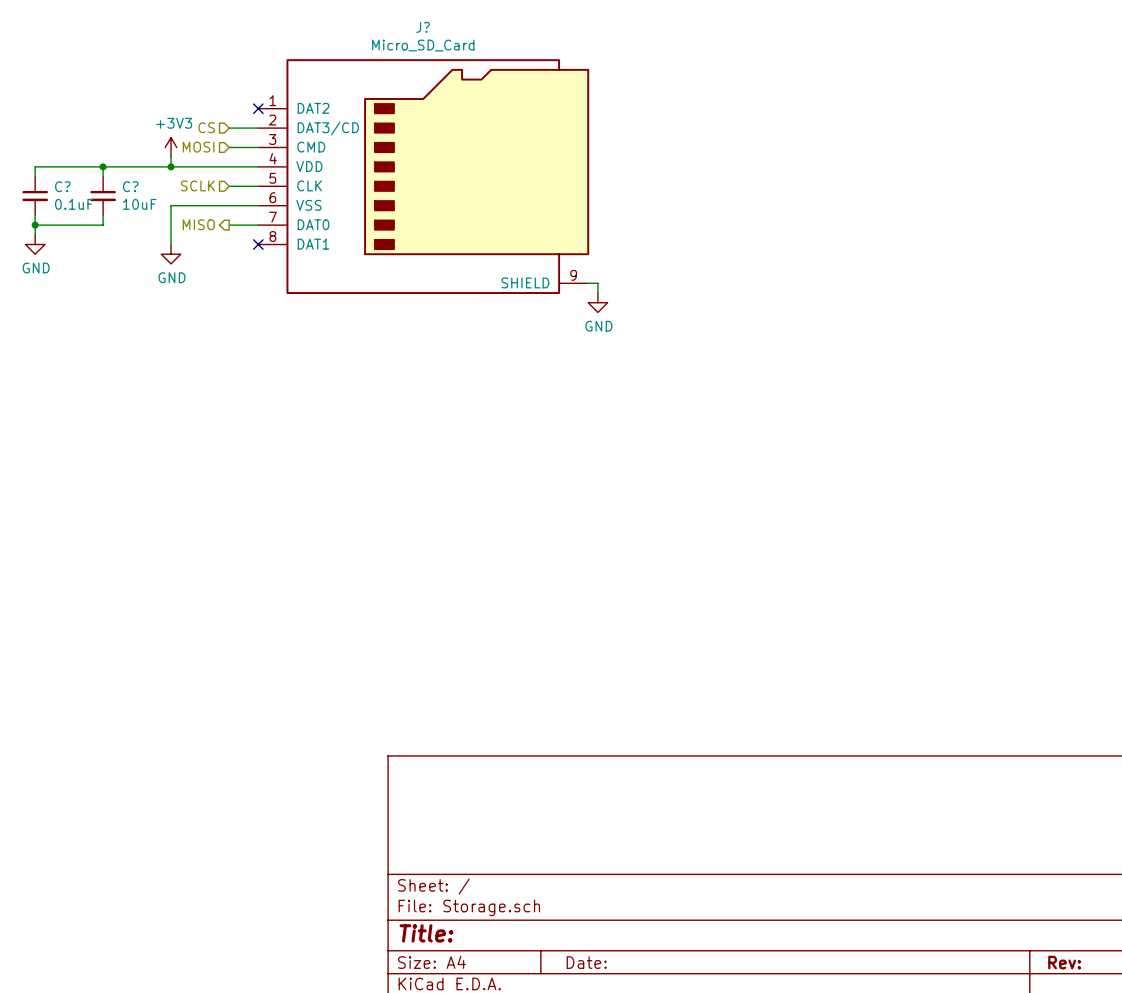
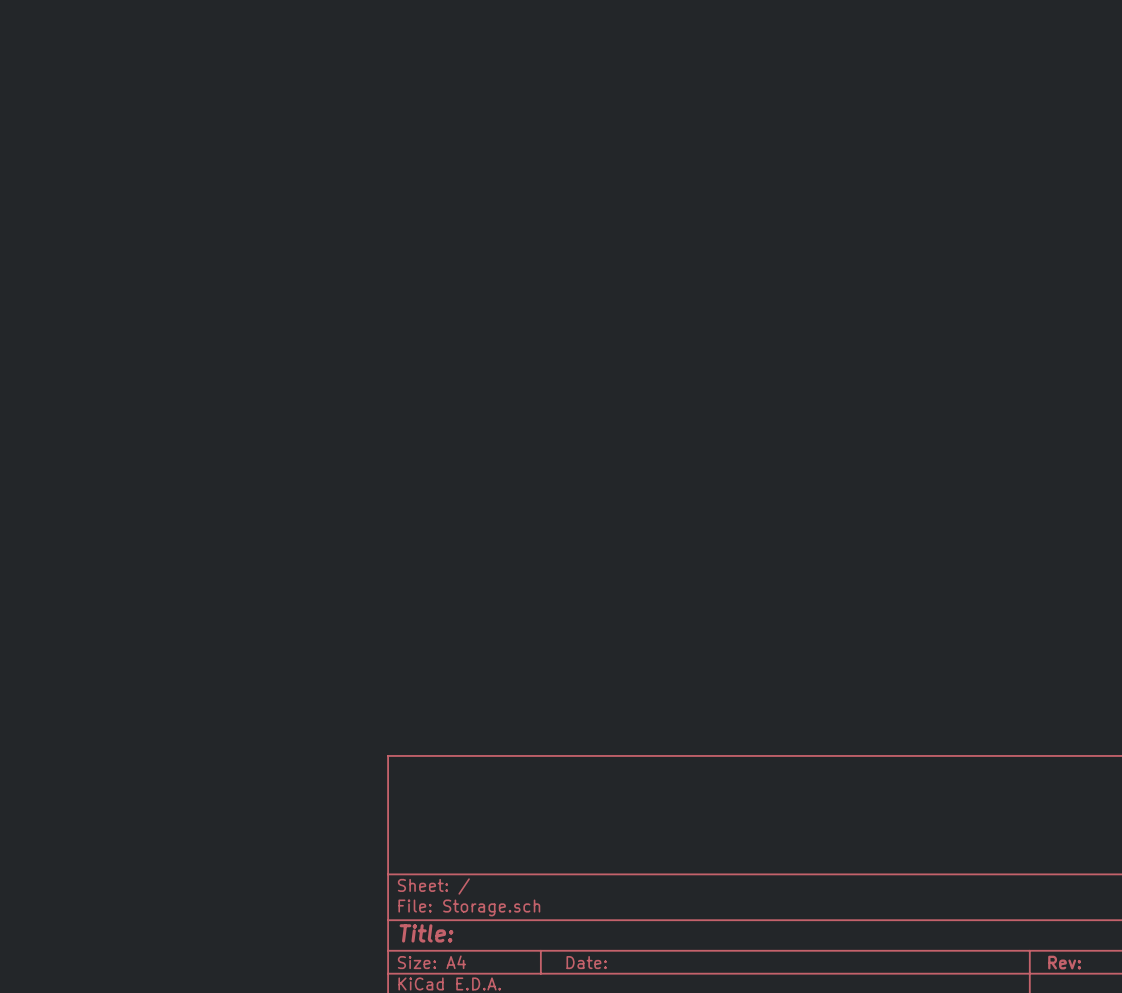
no-connect mark: (258, 108) -> none
hierarchical label: CS (206, 127) -> none
wire: (229, 128) (258, 128) -> none
power symbol: +3V3 (171, 147) -> none
hierarchical label: MOSI (198, 147) -> none
wire: (229, 147) (258, 147) -> none
wire: (171, 157) (171, 166) -> none
wire: (103, 166) (103, 176) -> none
junction: (103, 166) -> none
junction: (171, 166) -> none
wire: (258, 166) (35, 166) (35, 176) -> none
J?: Micro_SD_Card (423, 176) -> none
hierarchical label: SCLK (197, 185) -> none
wire: (229, 186) (258, 186) -> none
C?: 0.1uF (35, 196) -> none
C?: 10uF (103, 196) -> none
wire: (258, 205) (171, 205) (171, 244) -> none
wire: (35, 215) (35, 234) -> none
wire: (103, 215) (103, 225) (35, 225) -> none
hierarchical label: MISO (198, 224) -> none
junction: (35, 225) -> none
wire: (229, 225) (258, 225) -> none
power symbol: GND (35, 244) -> none
no-connect mark: (258, 244) -> none
power symbol: GND (171, 254) -> none
wire: (588, 283) (597, 283) (597, 293) -> none
power symbol: GND (597, 302) -> none

